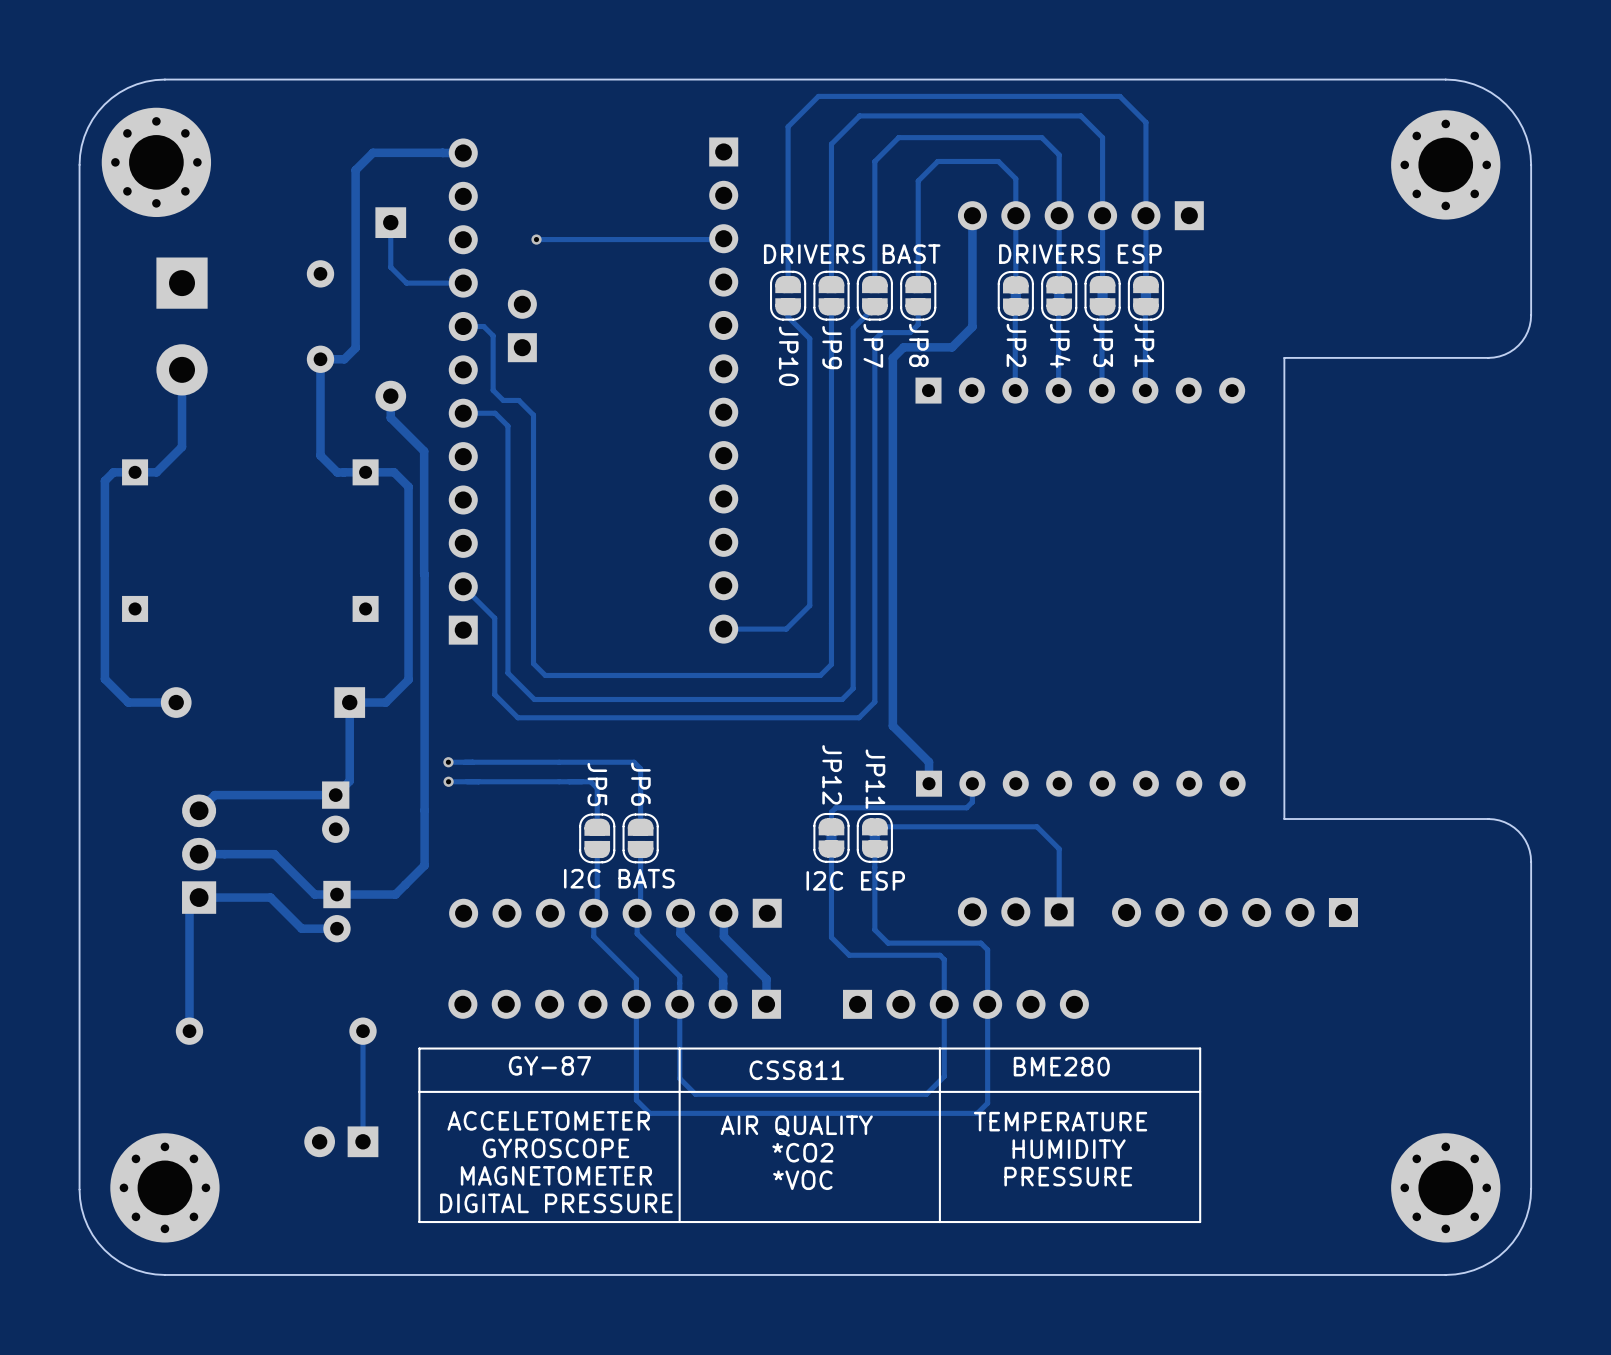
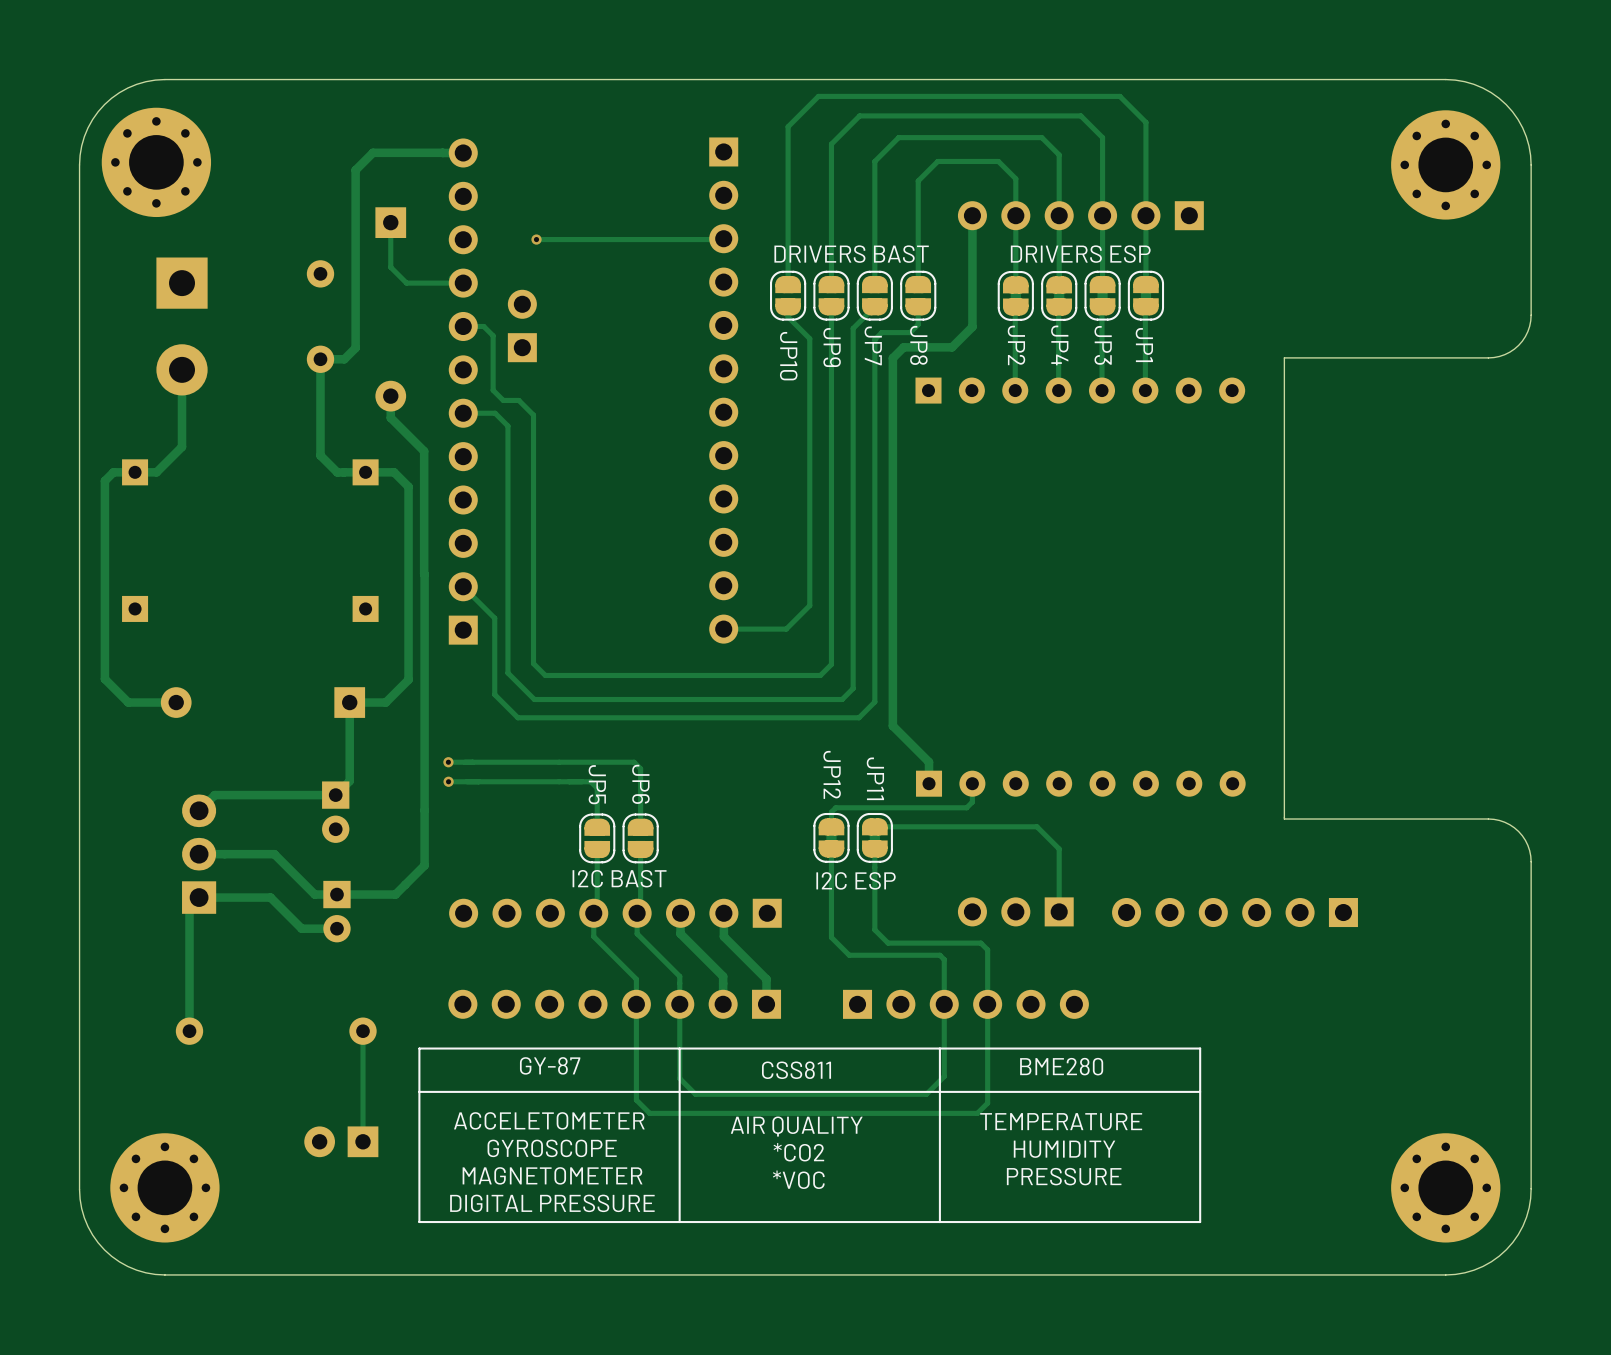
text: I2C BATS (619, 878) -> I2C BAST (619, 878)

